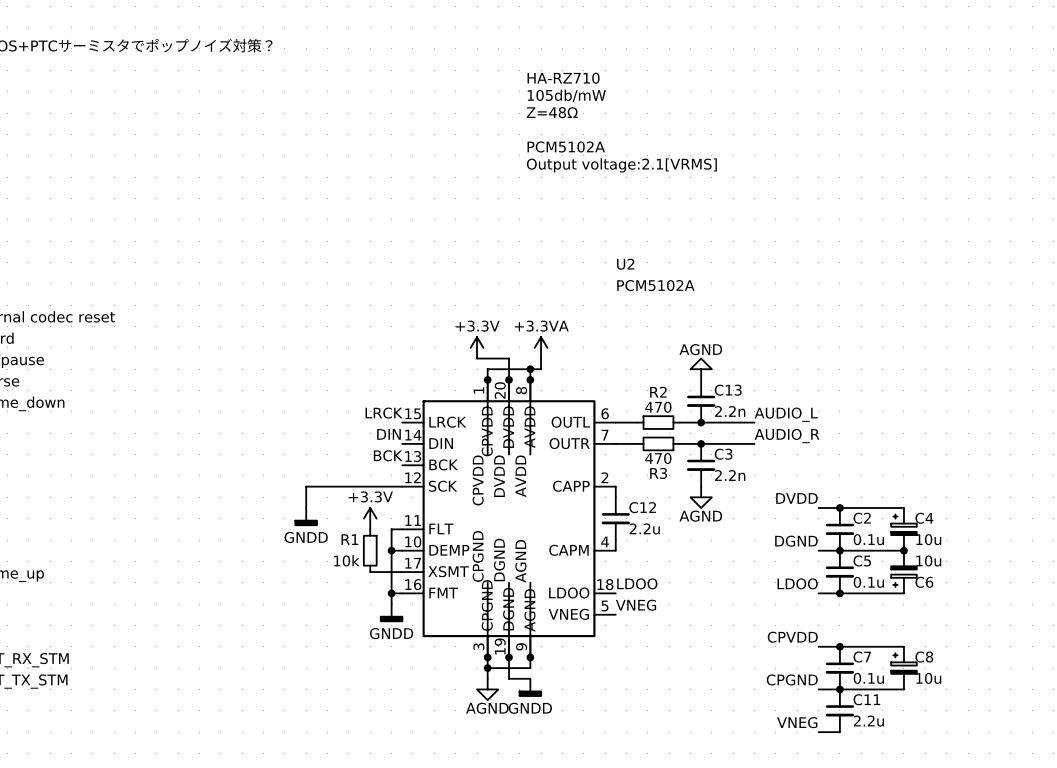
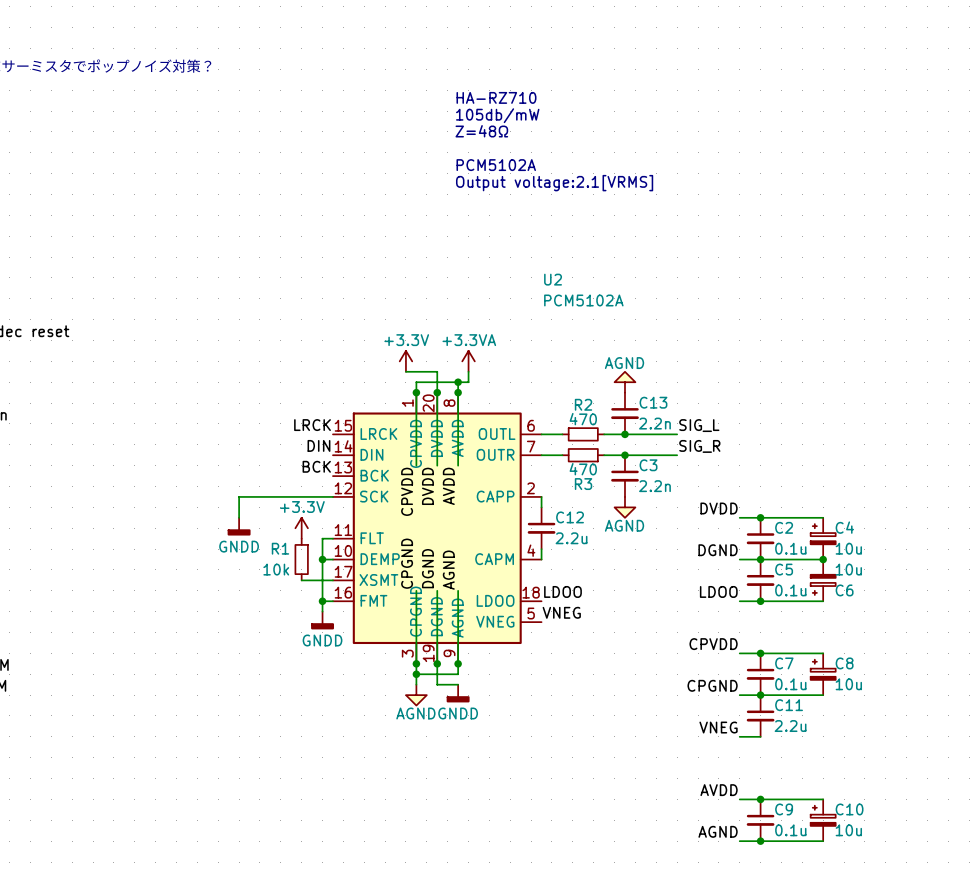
label: AUDIO_L (786, 414) -> SIG_L (699, 425)
label: AUDIO_R (787, 436) -> SIG_R (699, 446)

